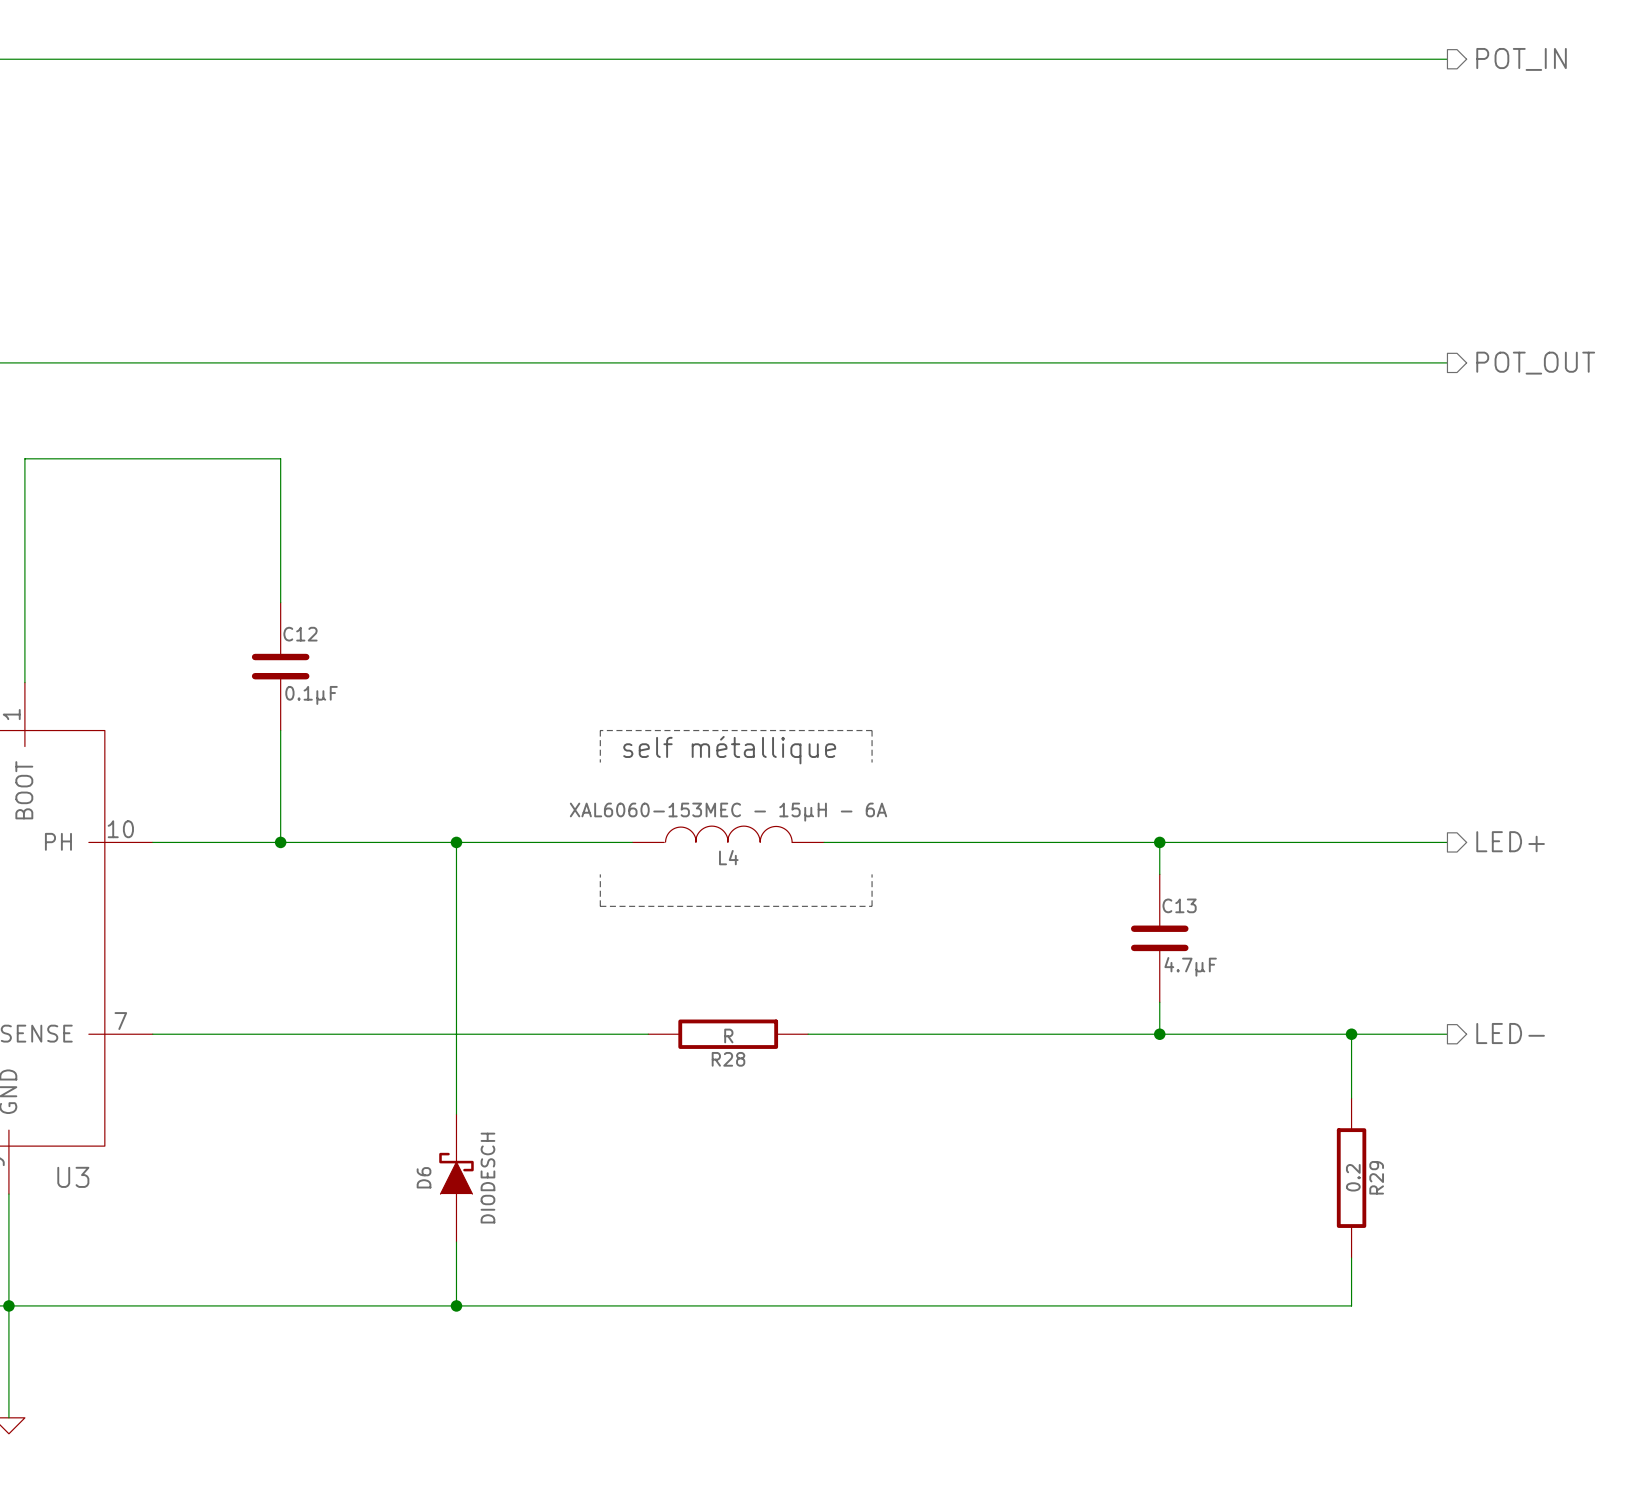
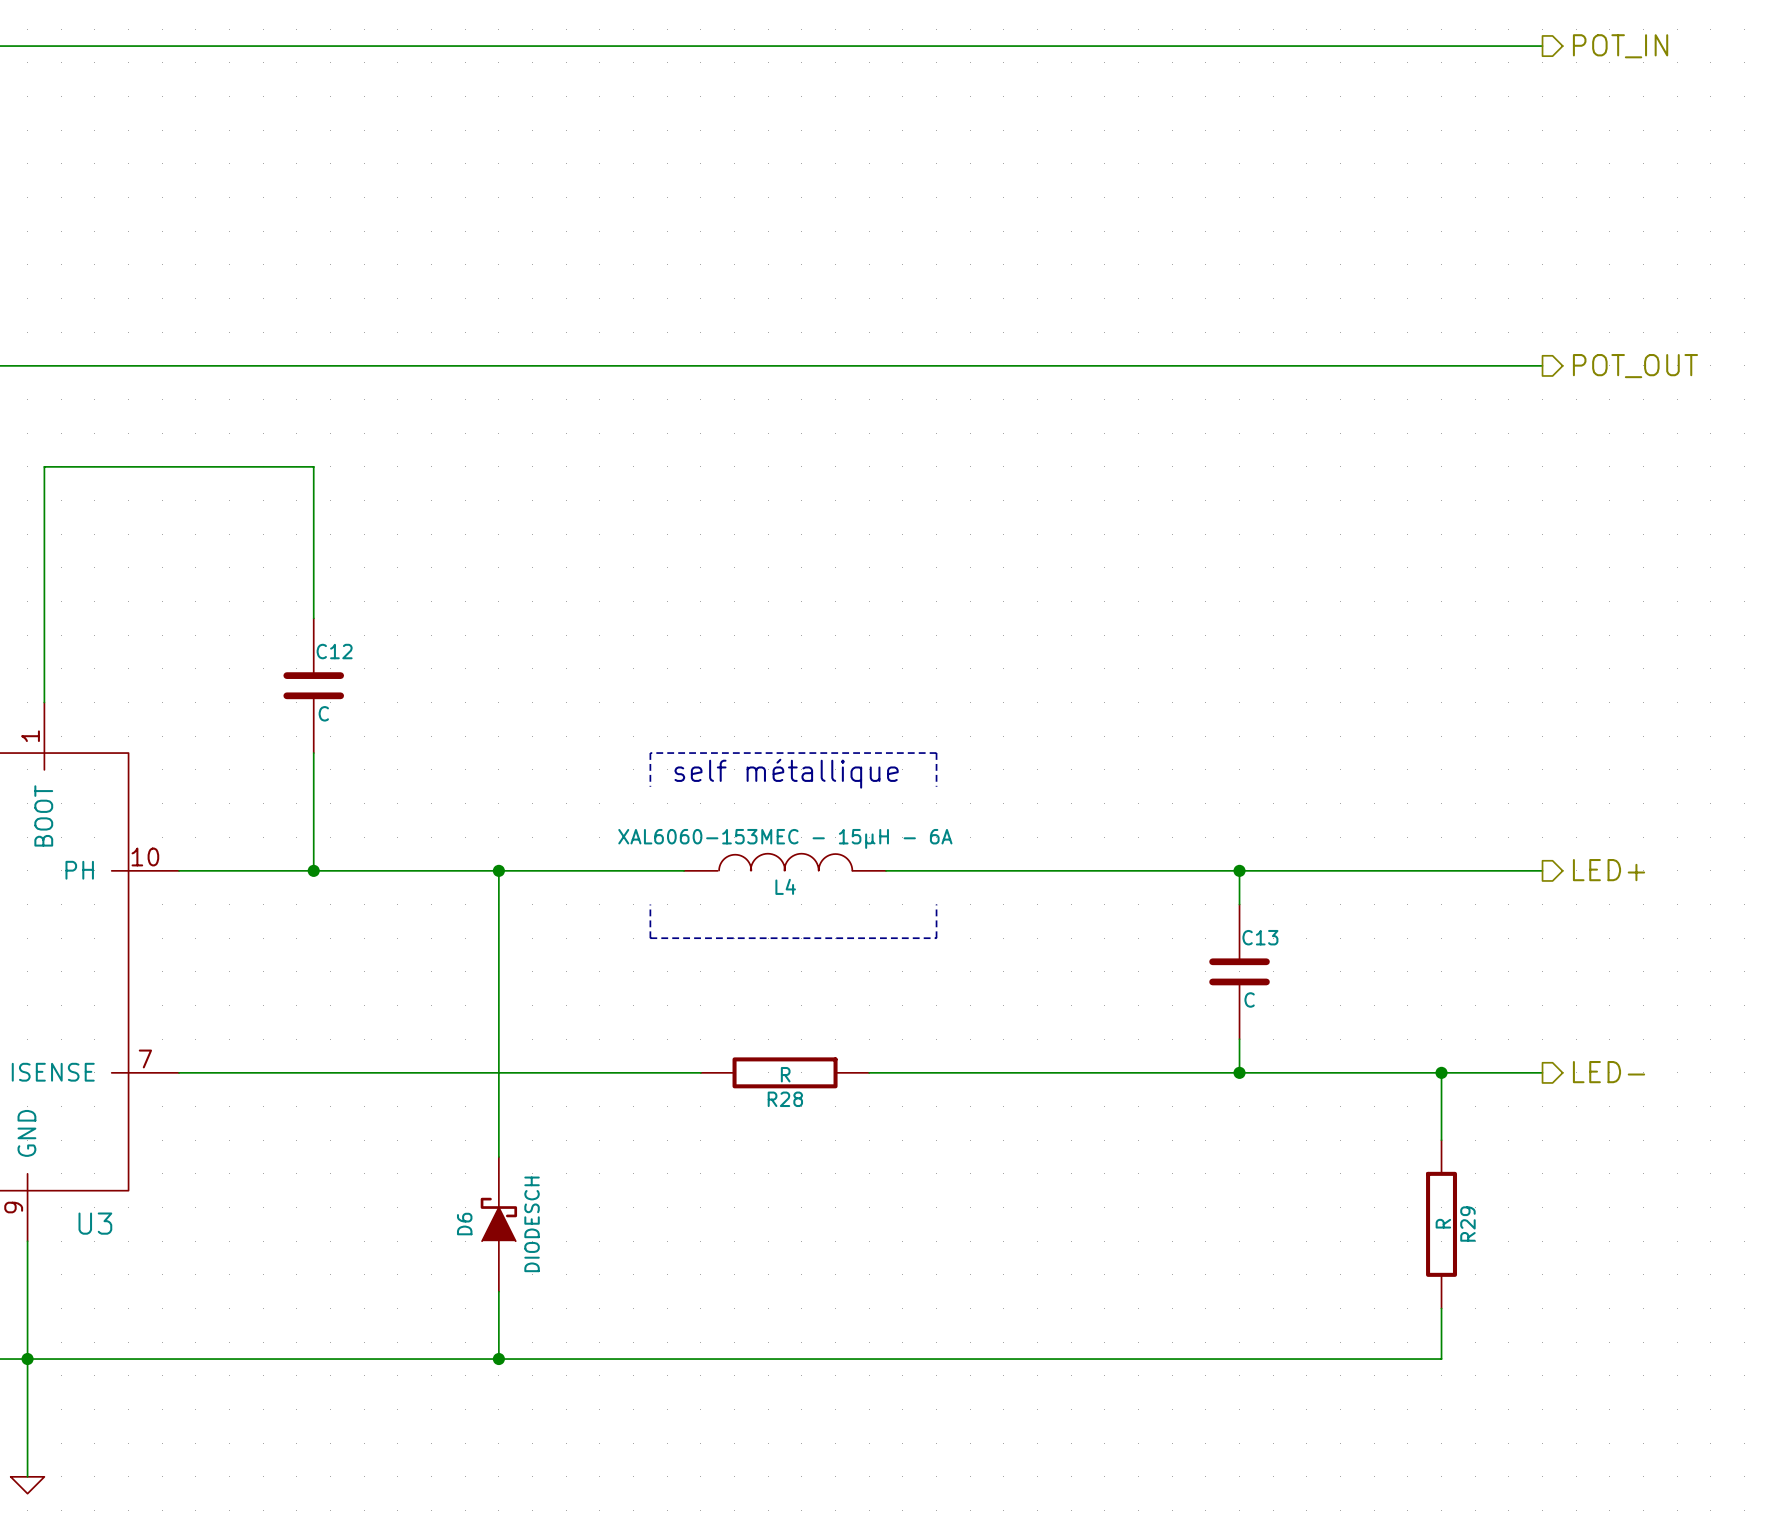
C12 value: 0.1µF (311, 695) -> C (323, 713)
C13 value: 4.7µF (1190, 966) -> C (1249, 999)
R29 value: 0.2 (1353, 1177) -> R (1443, 1223)

